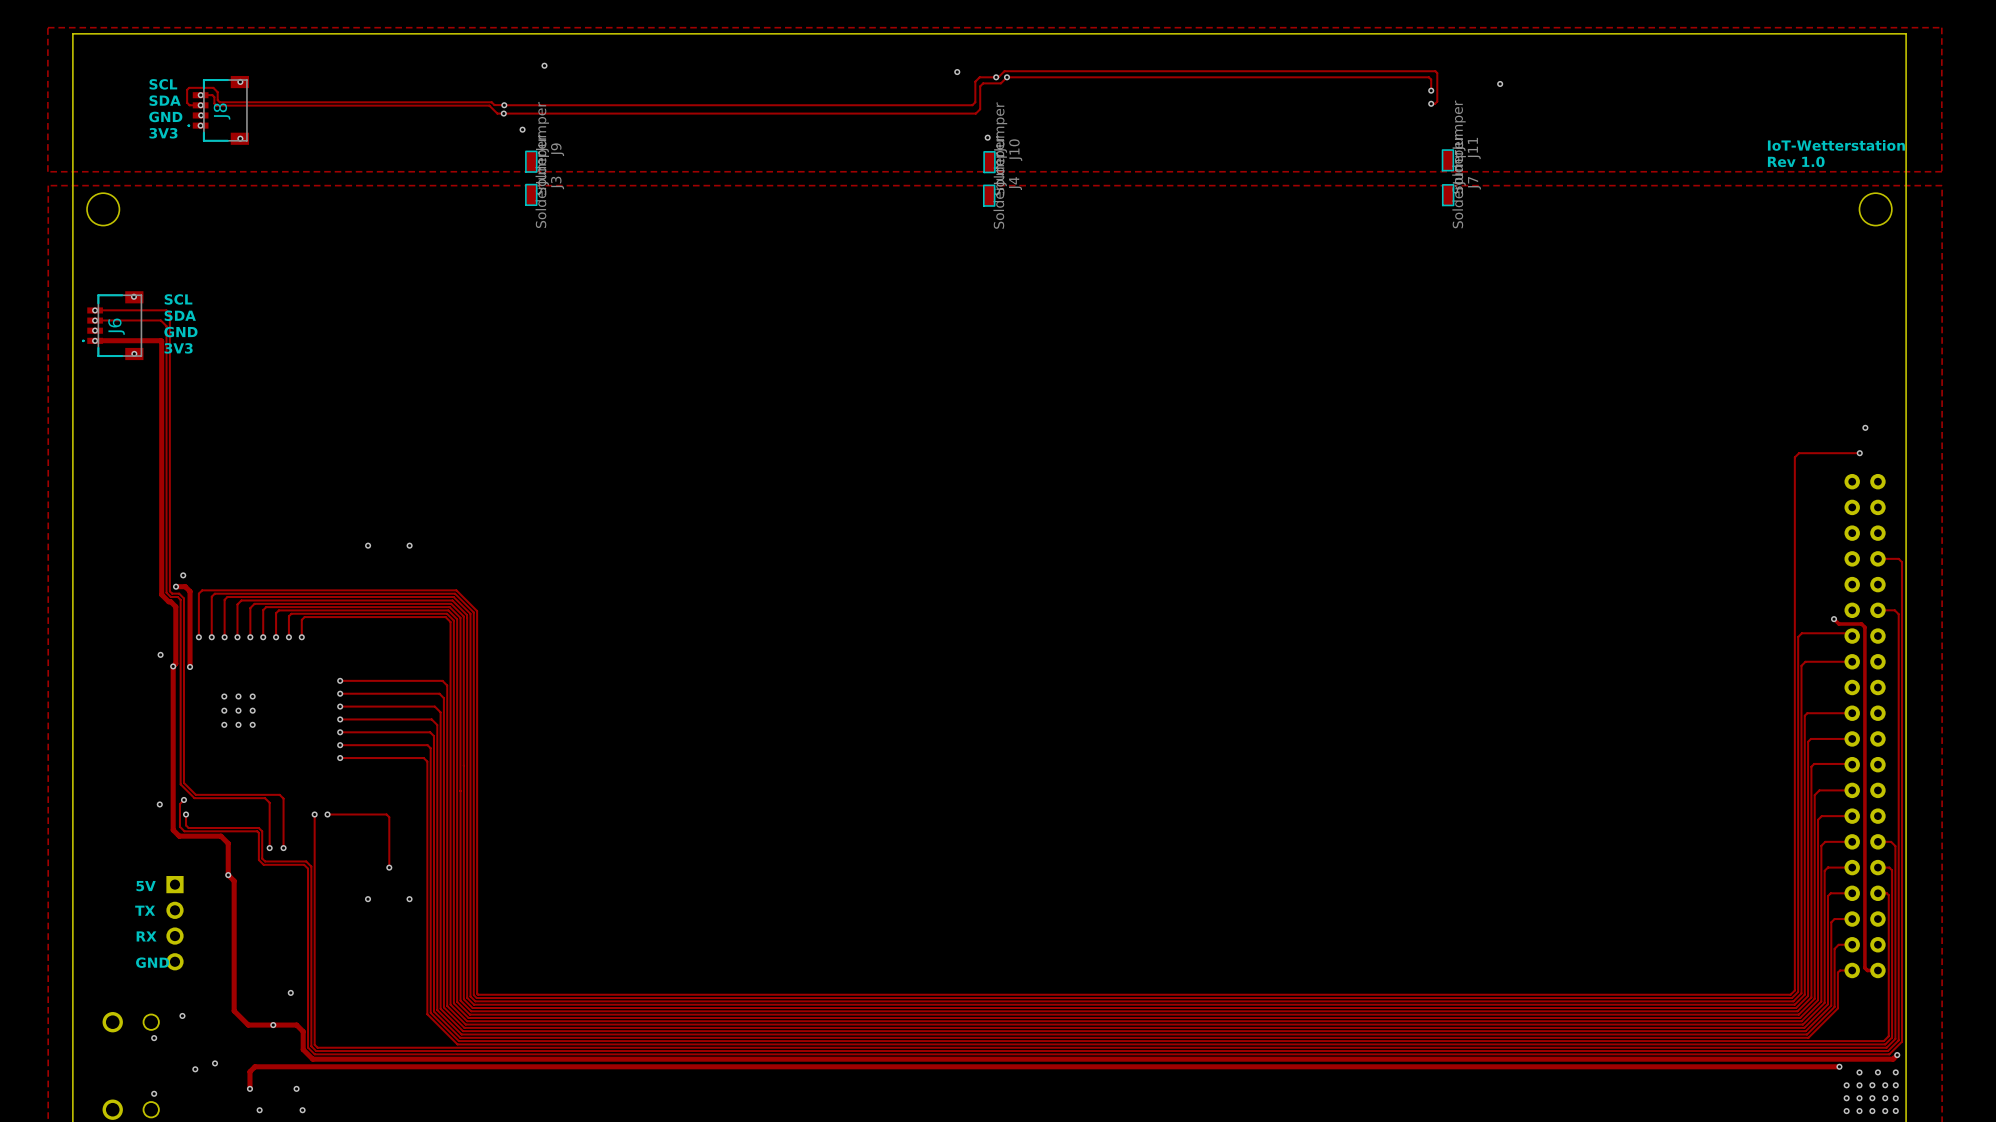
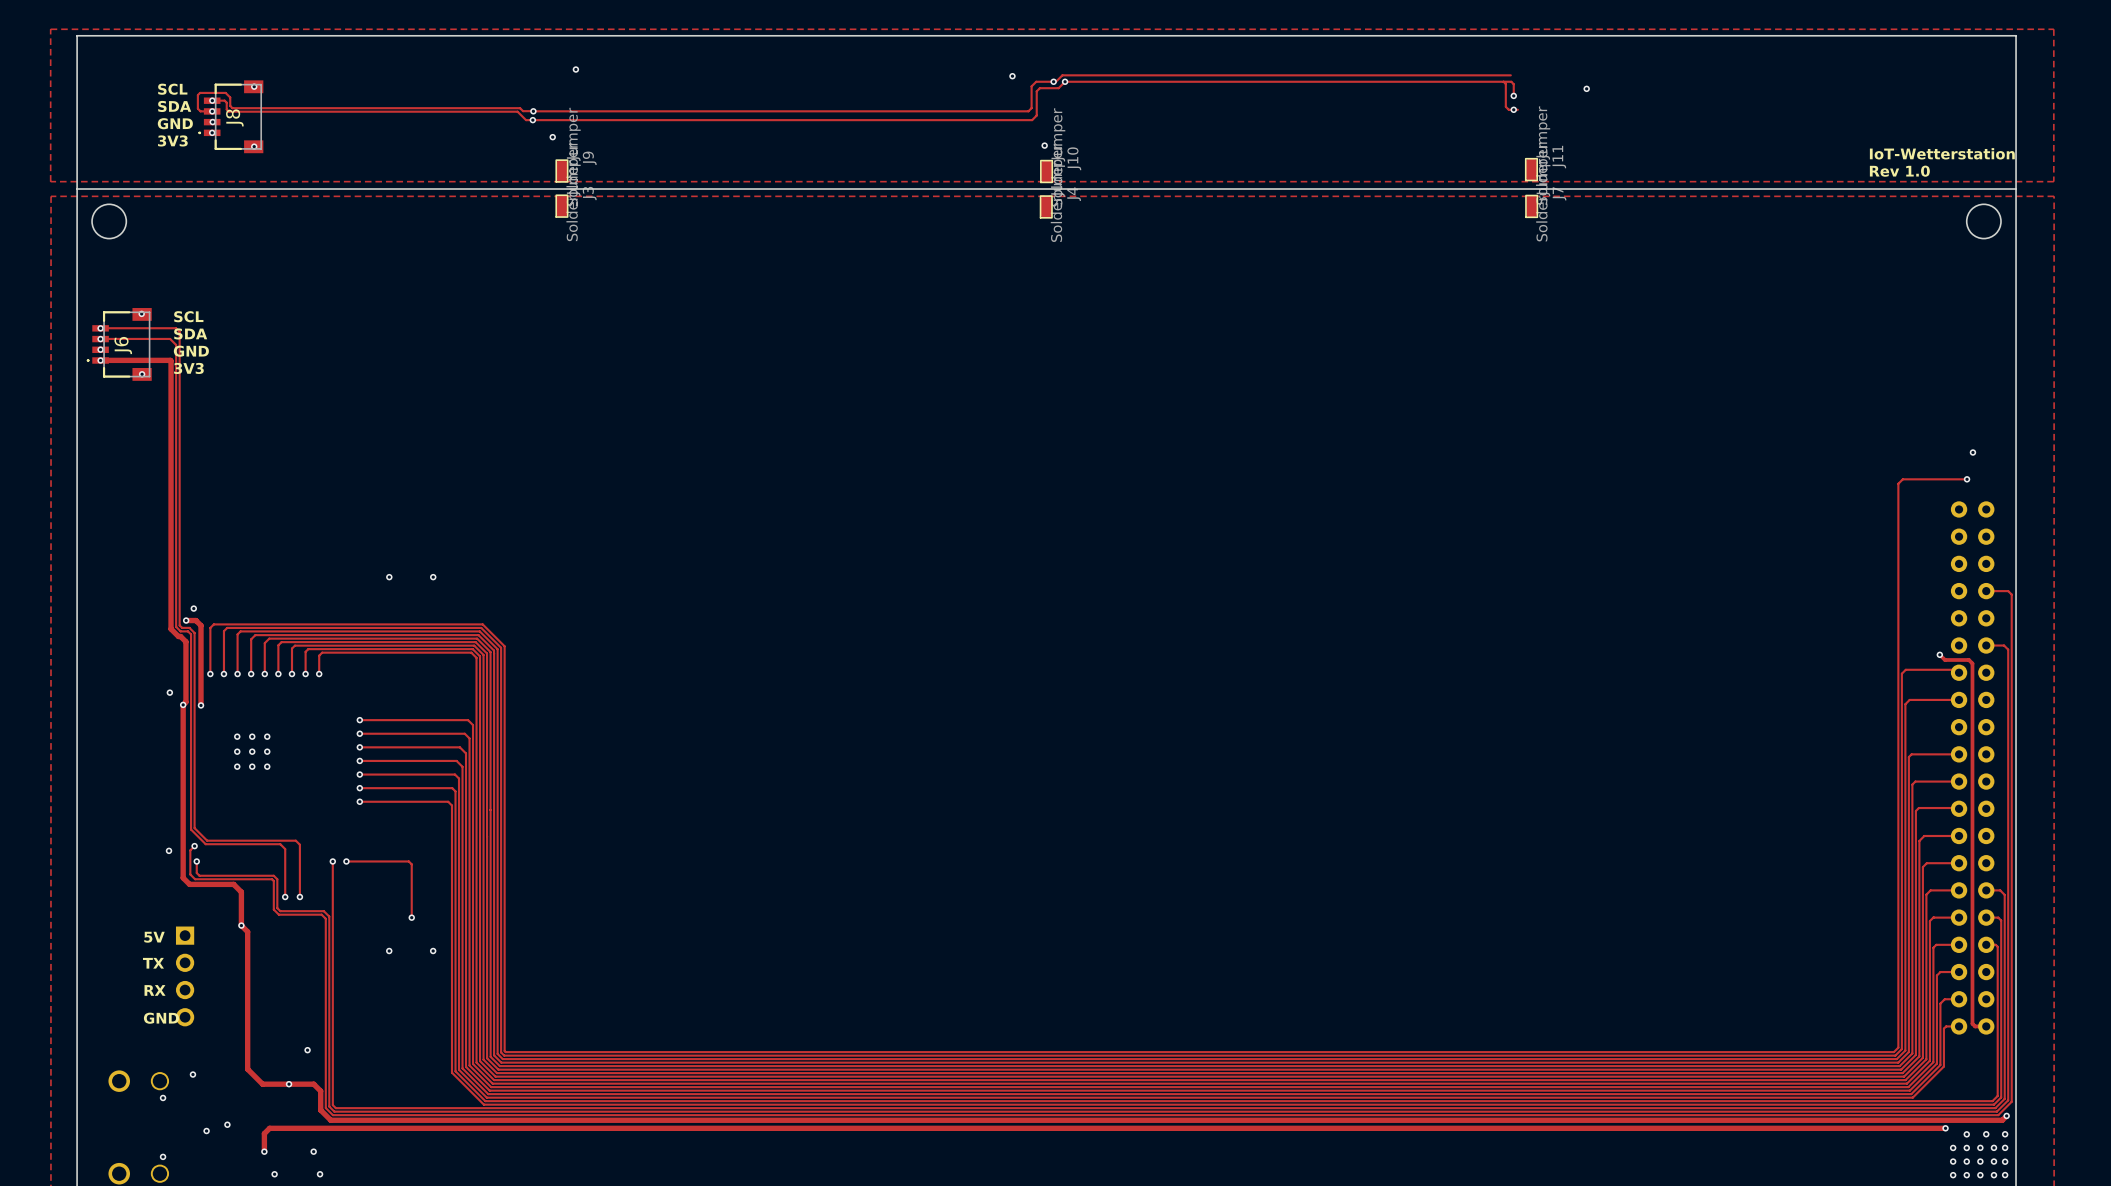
track: (1428, 71) (1437, 73) (1437, 101) (1435, 103) -> none
track: none -> (1503, 81) (1505, 83) (1505, 106) (1508, 109) (1513, 109)
board edge: none -> (77, 189) (2016, 189)

